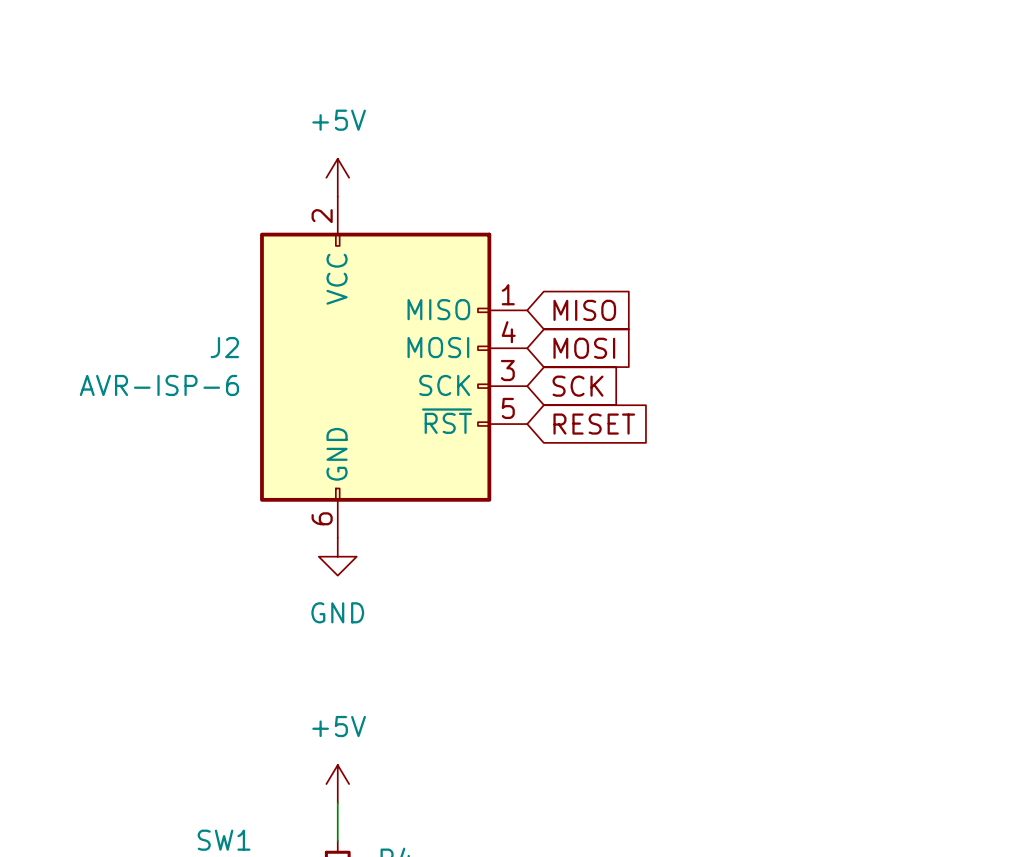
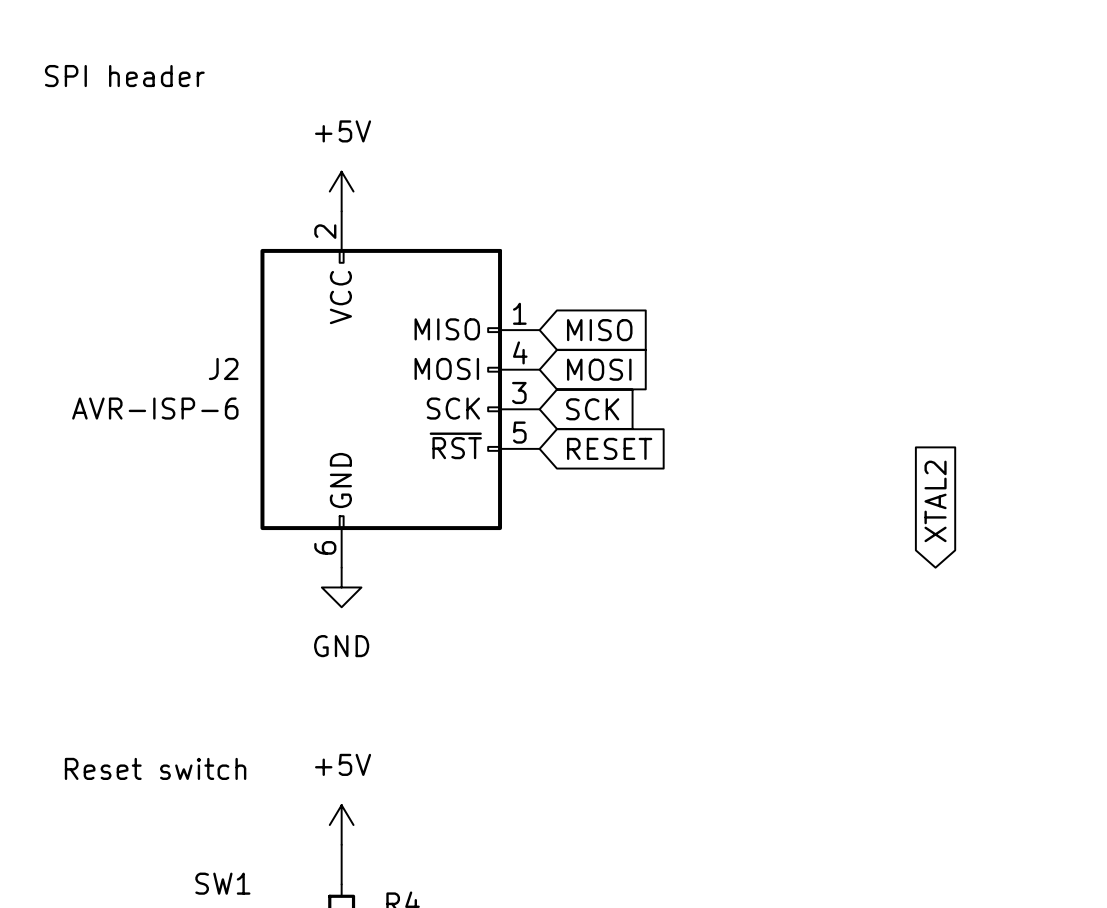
text: none -> SPI header (124, 76)
global label: none -> XTAL2 (935, 501)
text: none -> Reset switch (155, 768)

